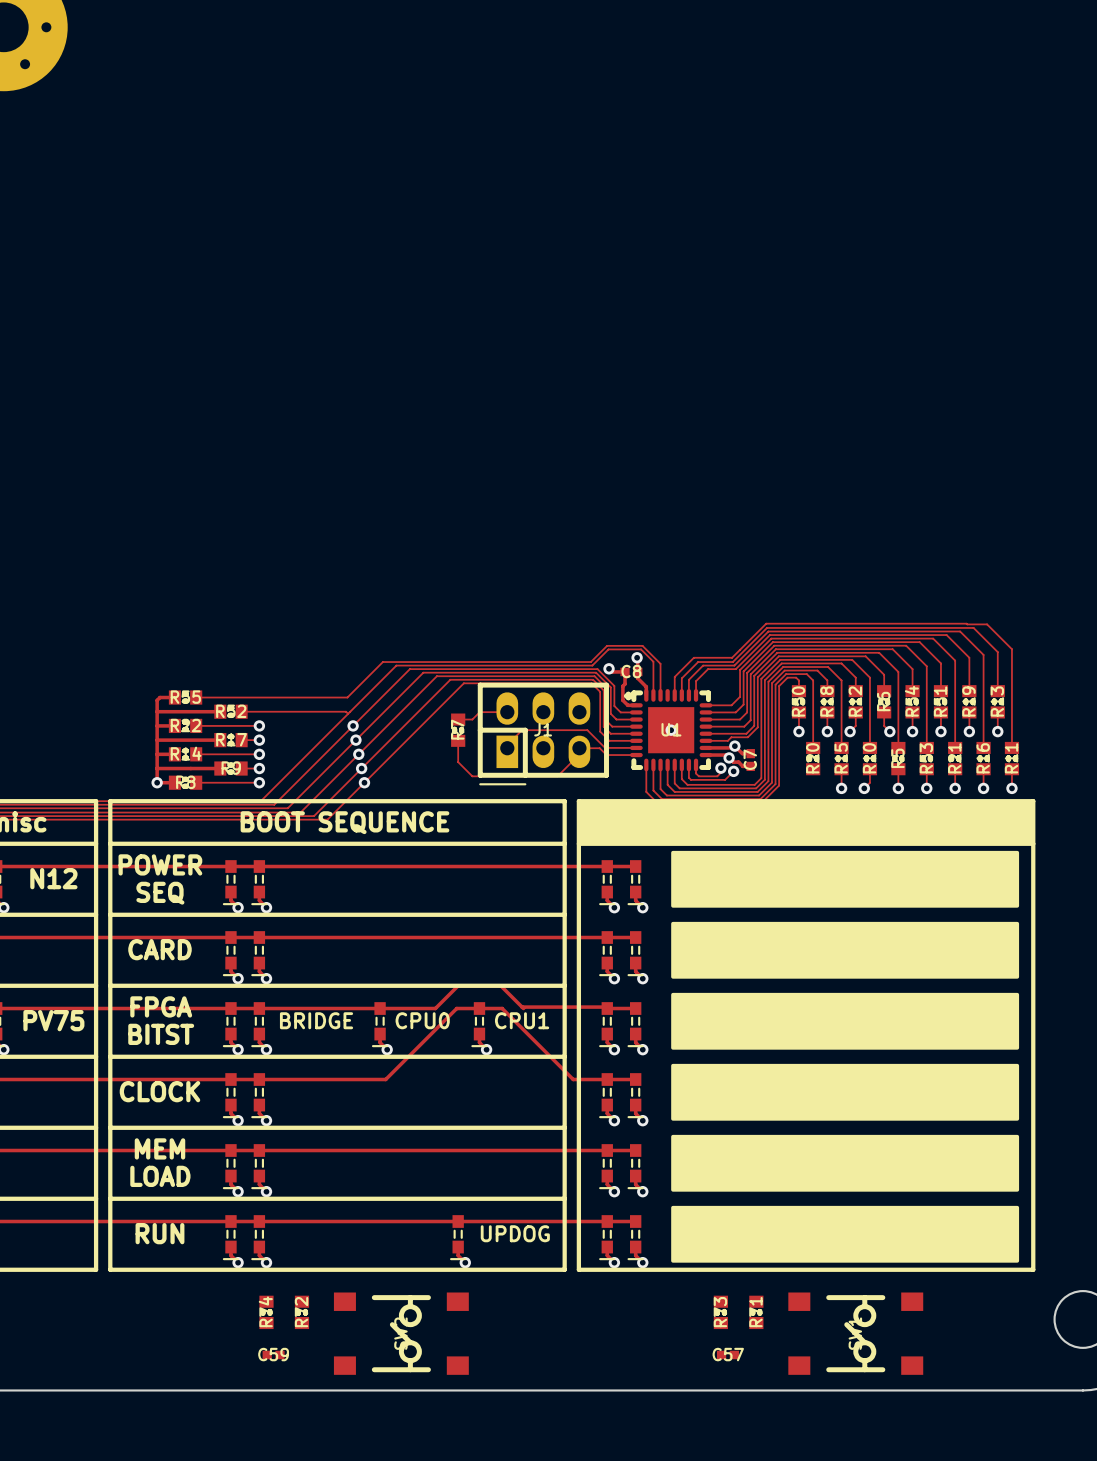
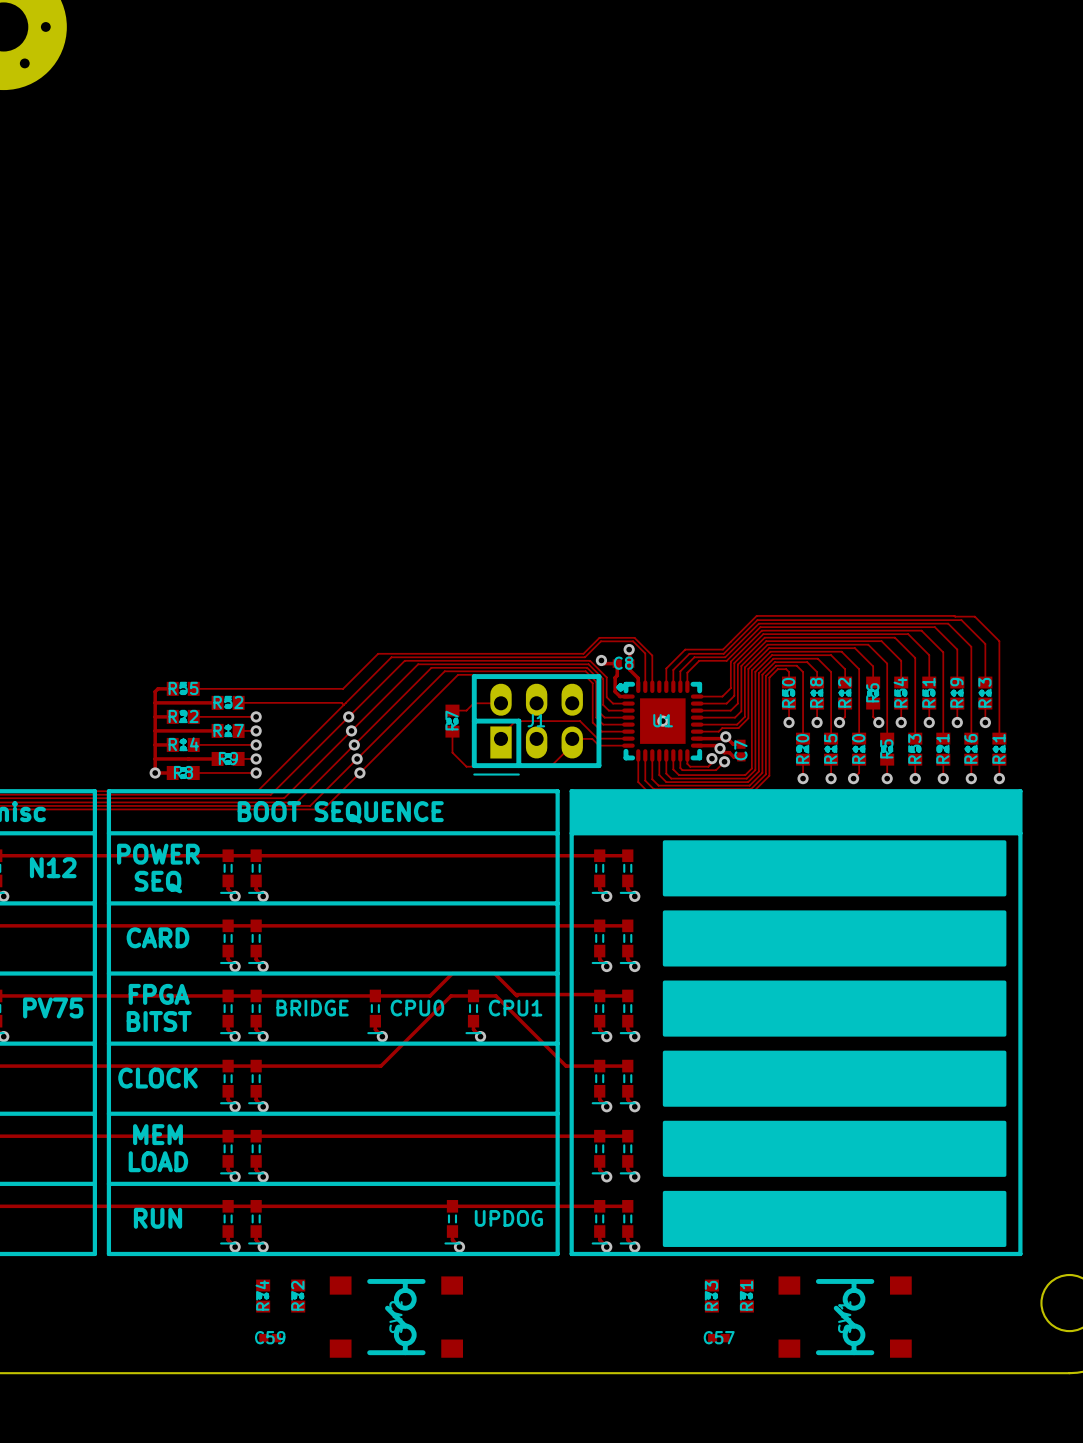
track: none -> (803, 759) (803, 778)
via: none -> (803, 778)

